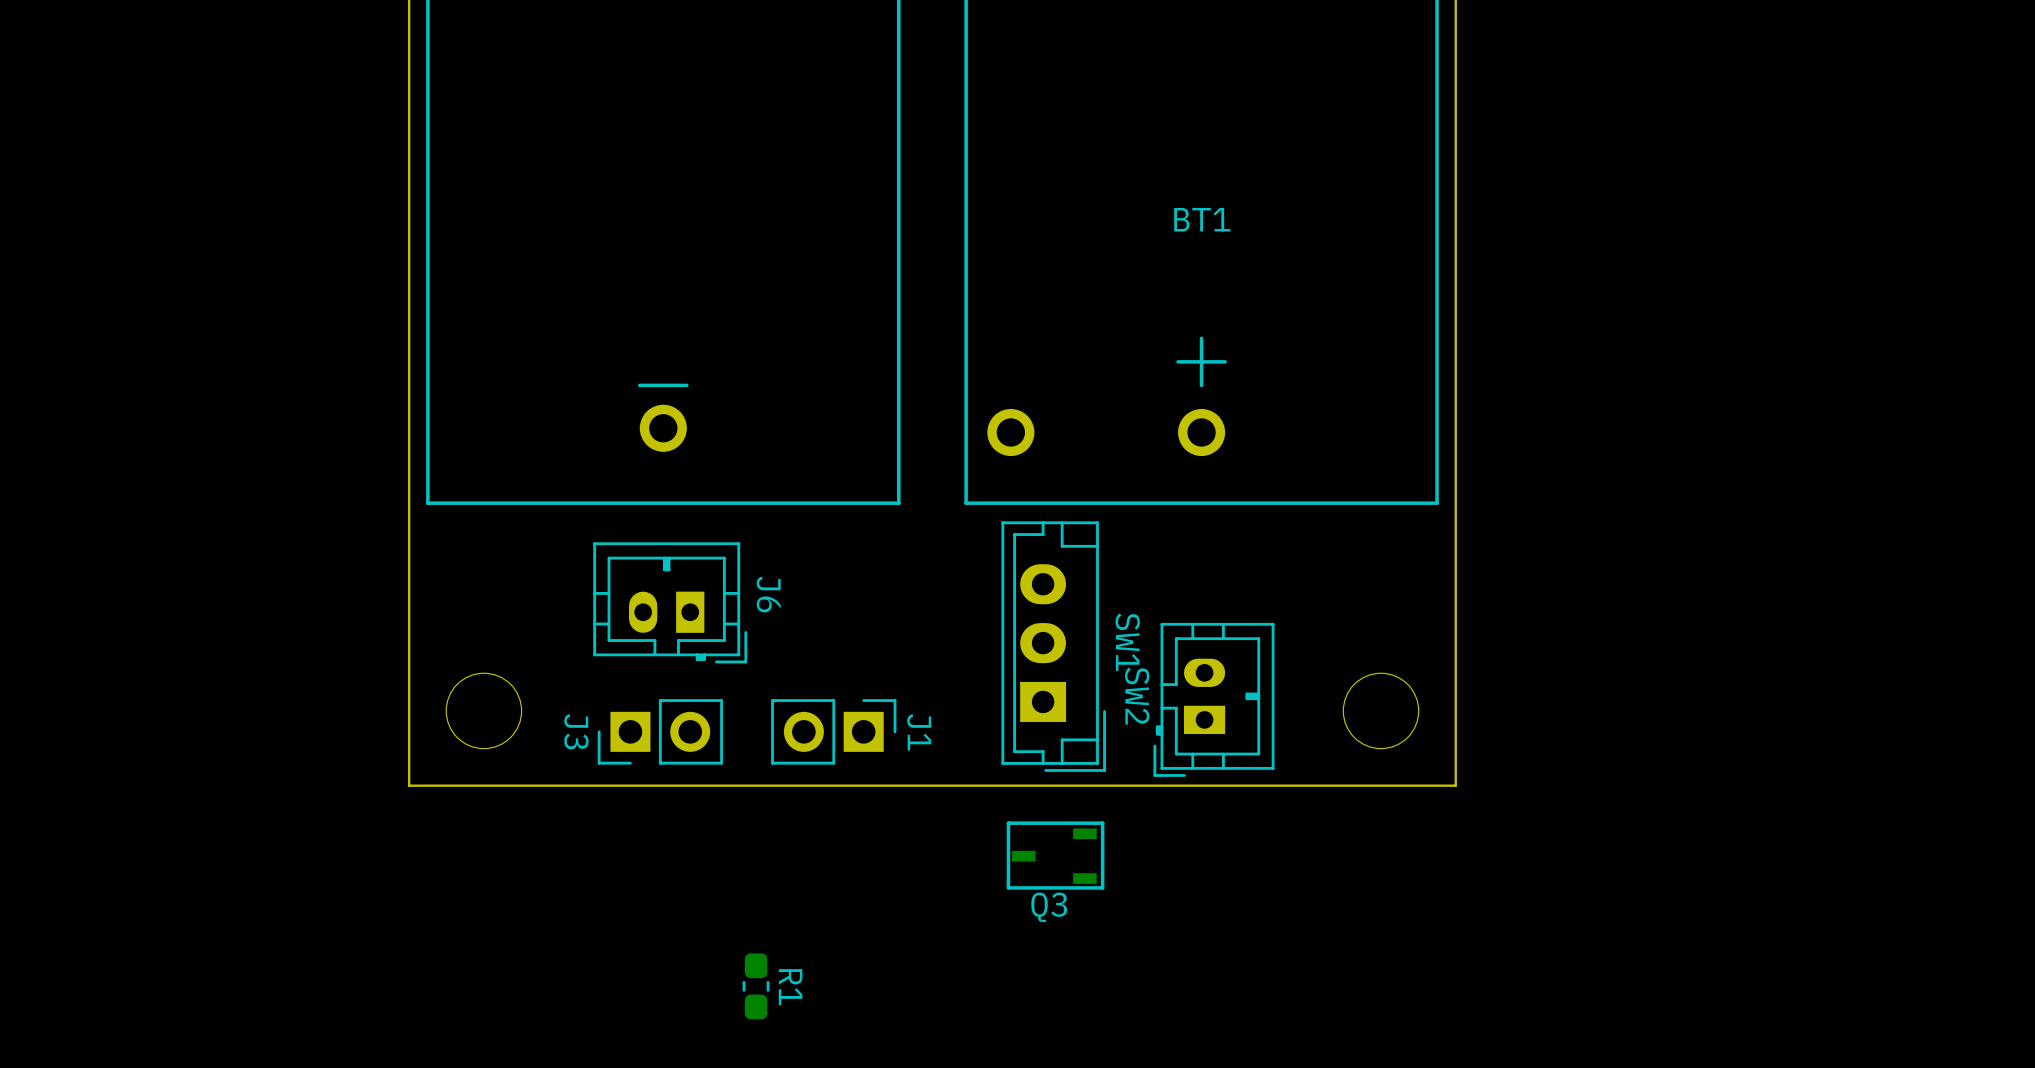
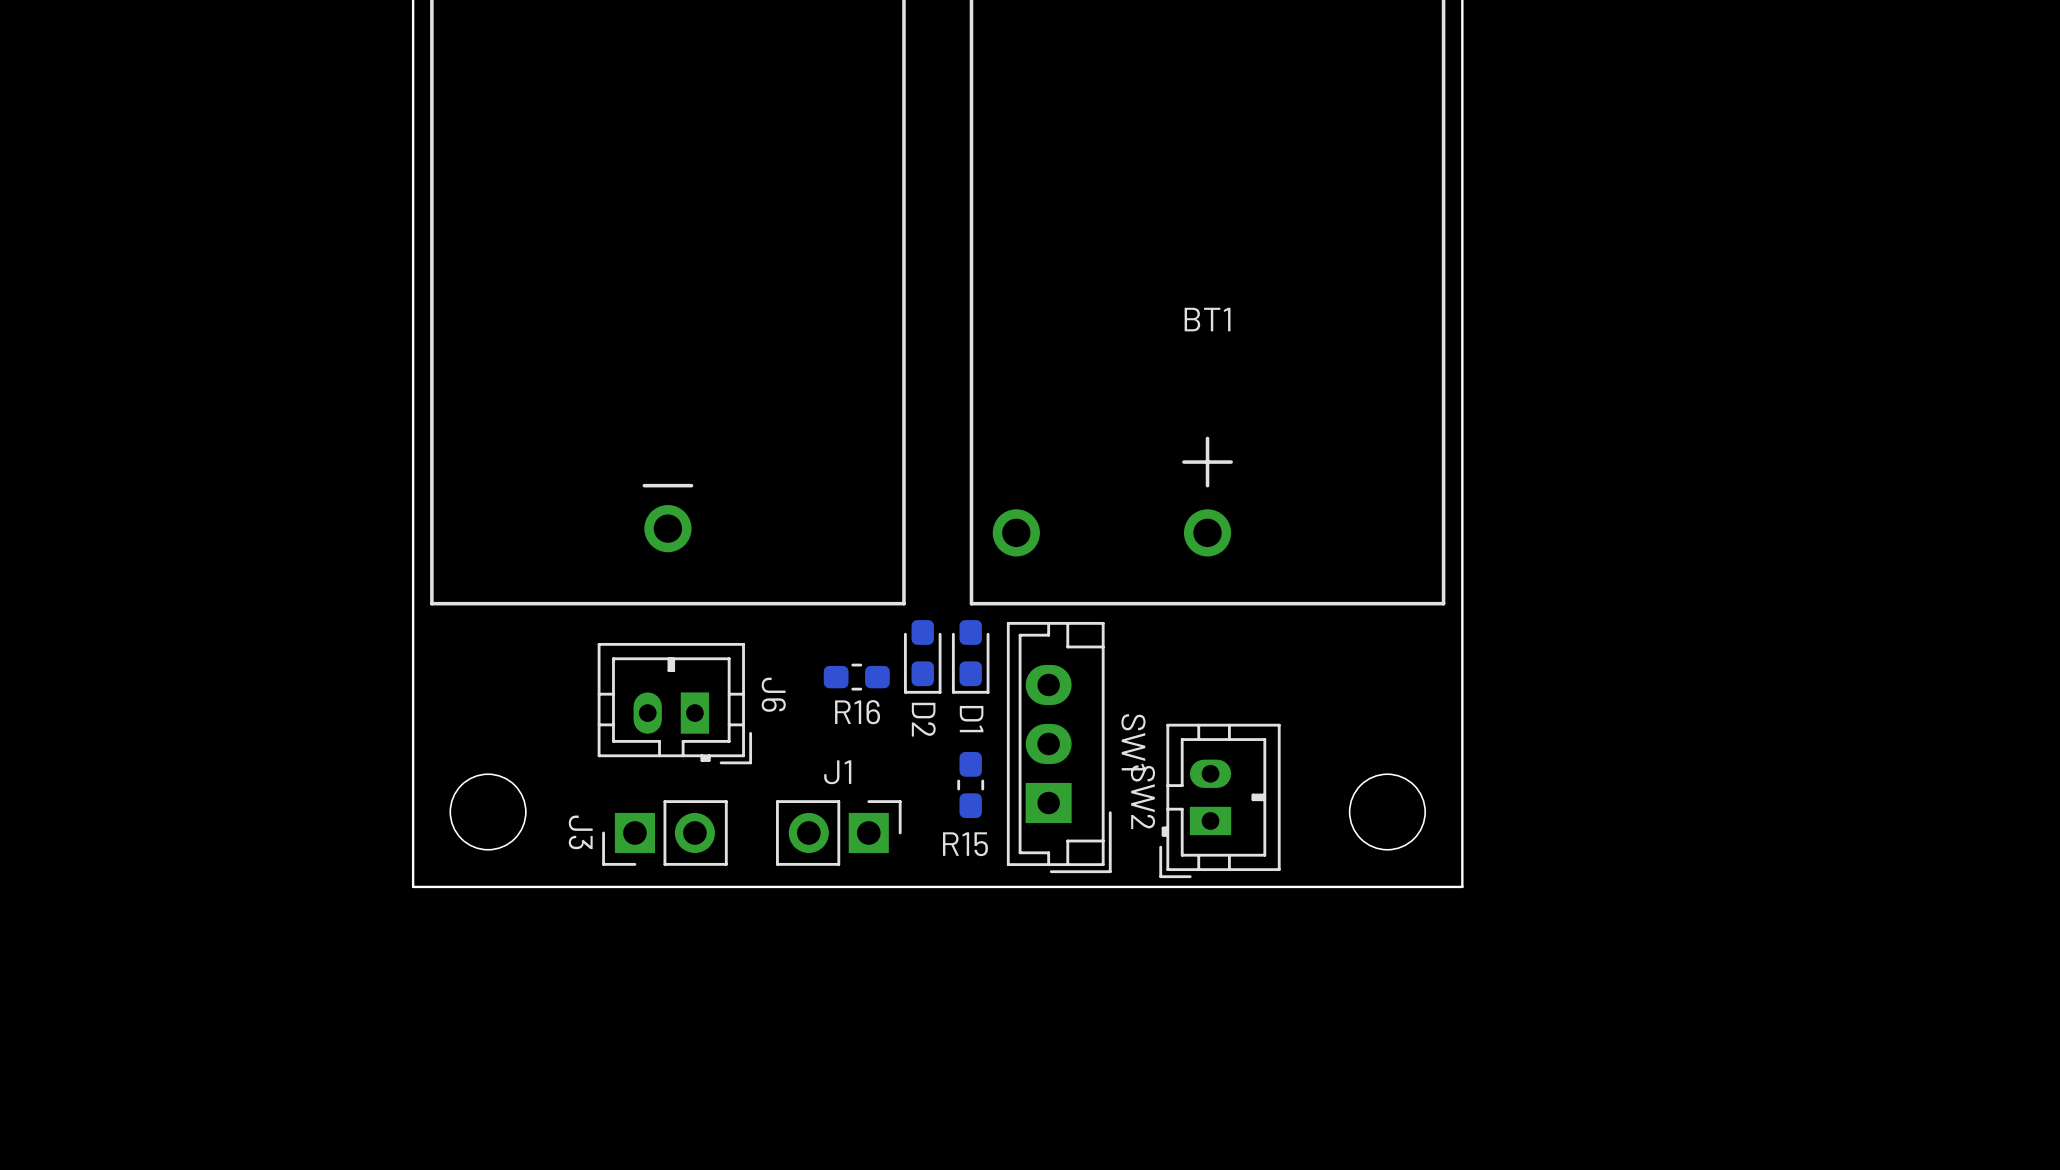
D2: none -> (922, 656)
D1: none -> (970, 656)
R16: none -> (856, 677)
R15: none -> (970, 785)
J1 name rotation: 0° (919, 732) -> 90° counterclockwise (837, 772)
J1 name position: J1 (919, 732) -> J1 (837, 772)
Q3: (1055, 855) -> none
R1: (756, 986) -> none

